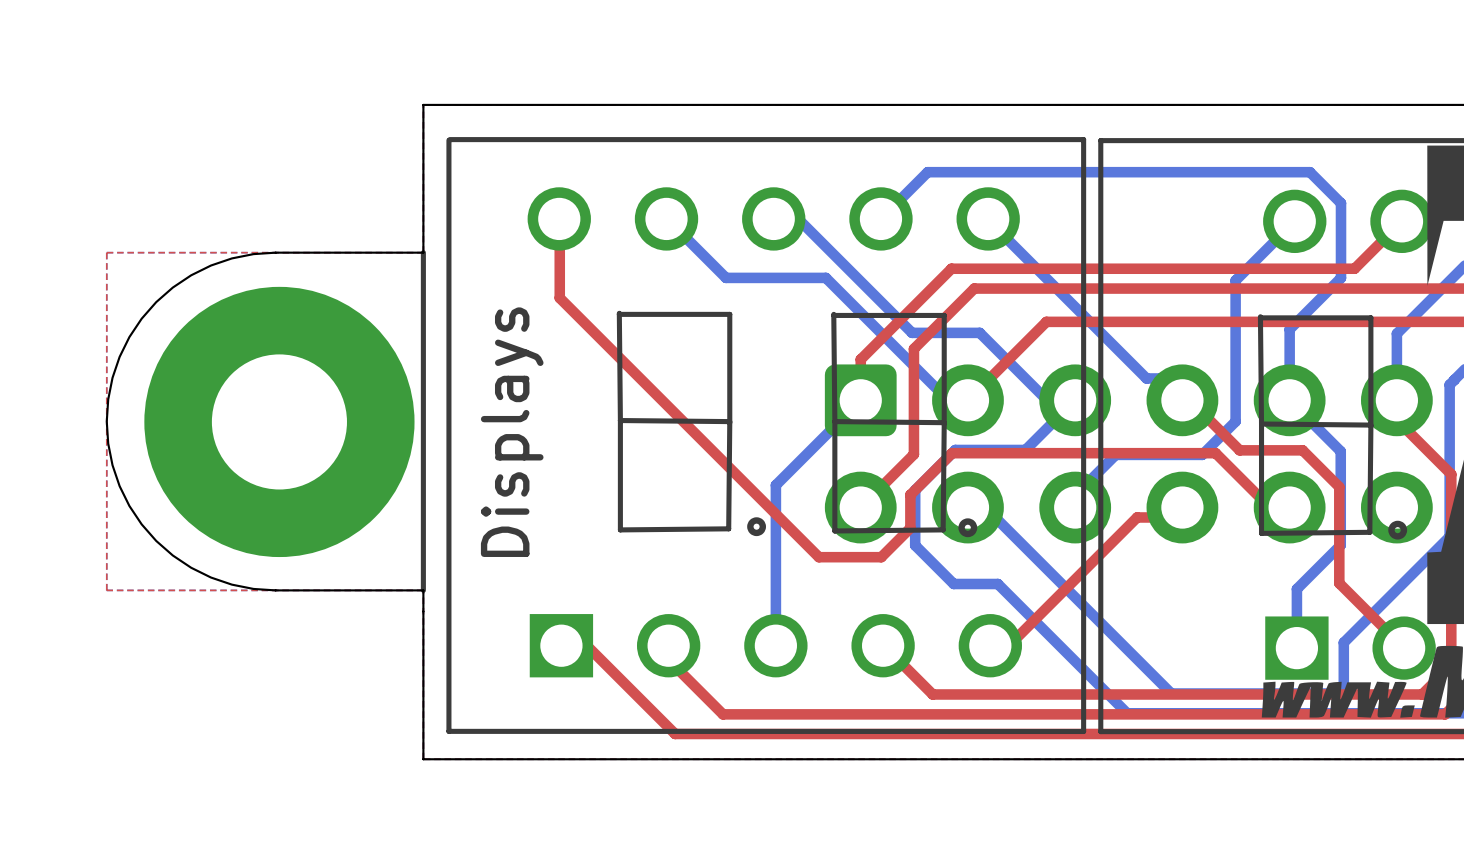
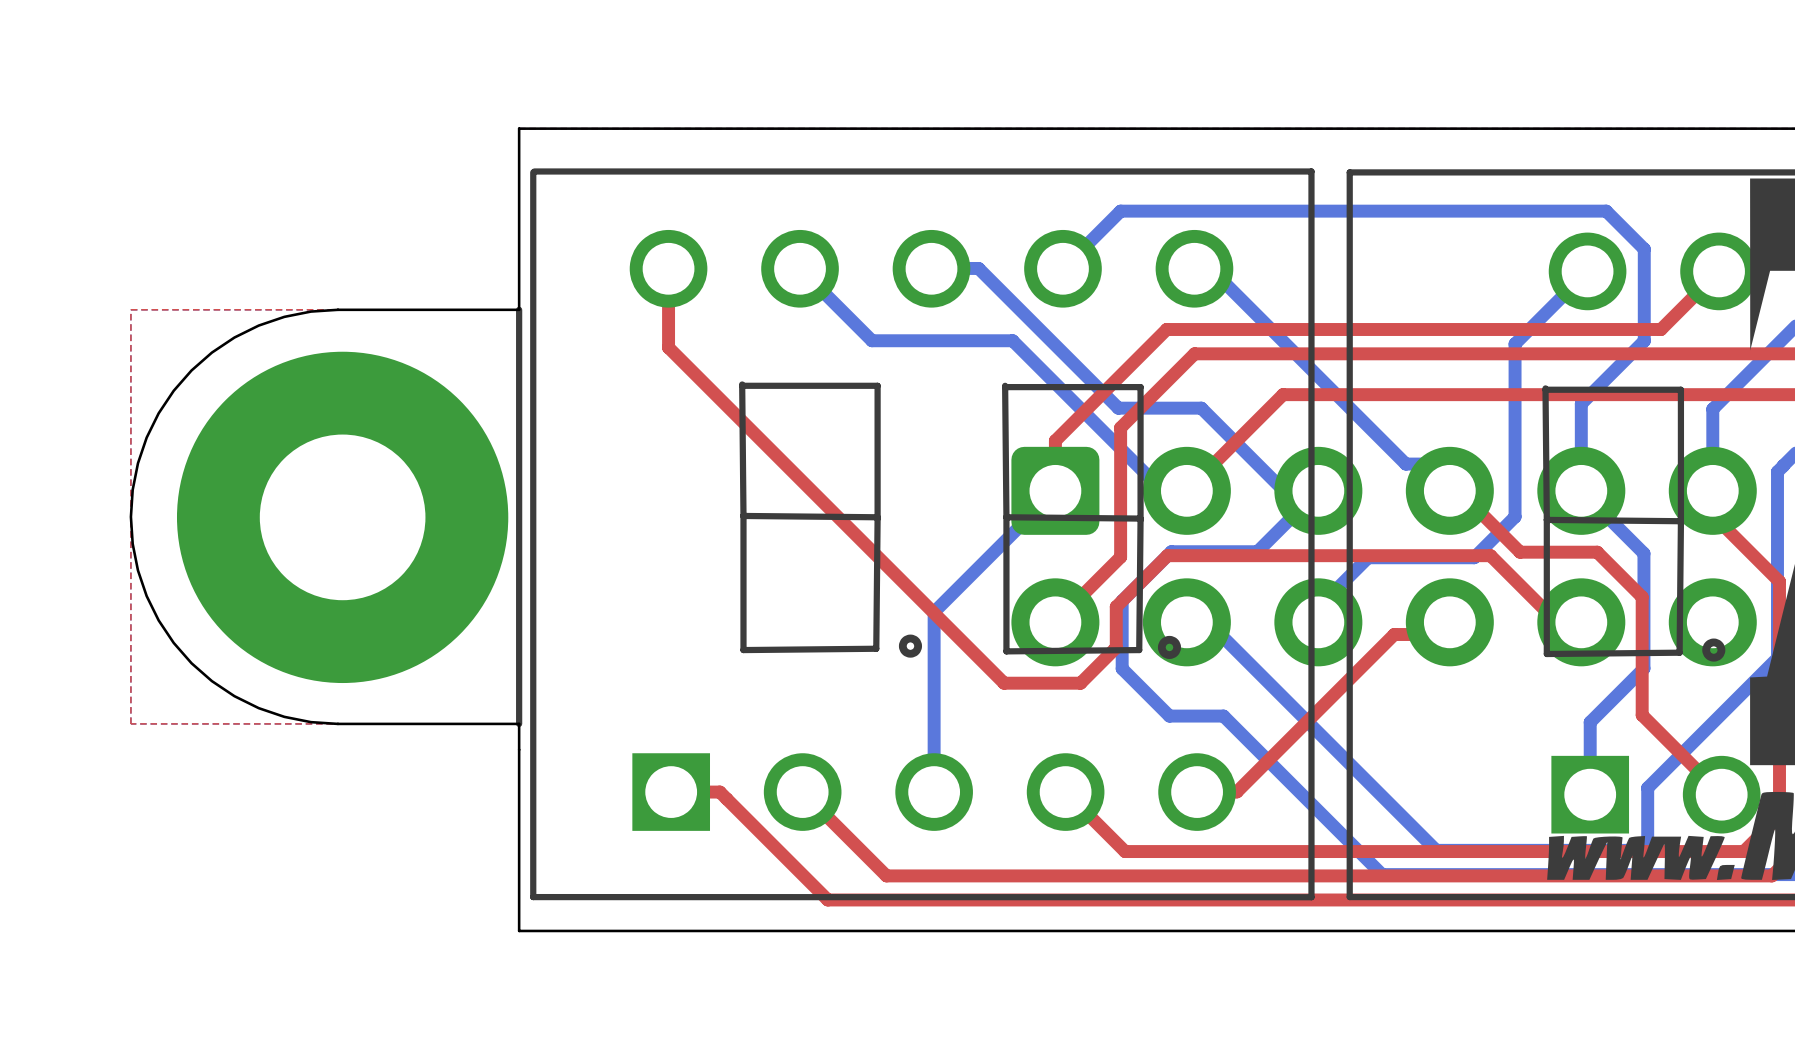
bottom track: (927, 172) (880, 218) -> (1137, 211) (1120, 211) (1062, 268)
bottom track: (667, 218) (725, 277) -> (800, 268) (871, 340) (890, 340)
top track: (559, 219) (559, 298) -> (668, 268) (668, 347) (686, 365)
text: Displays (512, 432) -> none
part position: (766, 435) -> (922, 534)
bottom track: (775, 485) (775, 645) -> (951, 594) (934, 612) (934, 792)
top track: (883, 645) (932, 694) -> (1065, 792) (1125, 851) (1143, 851)

